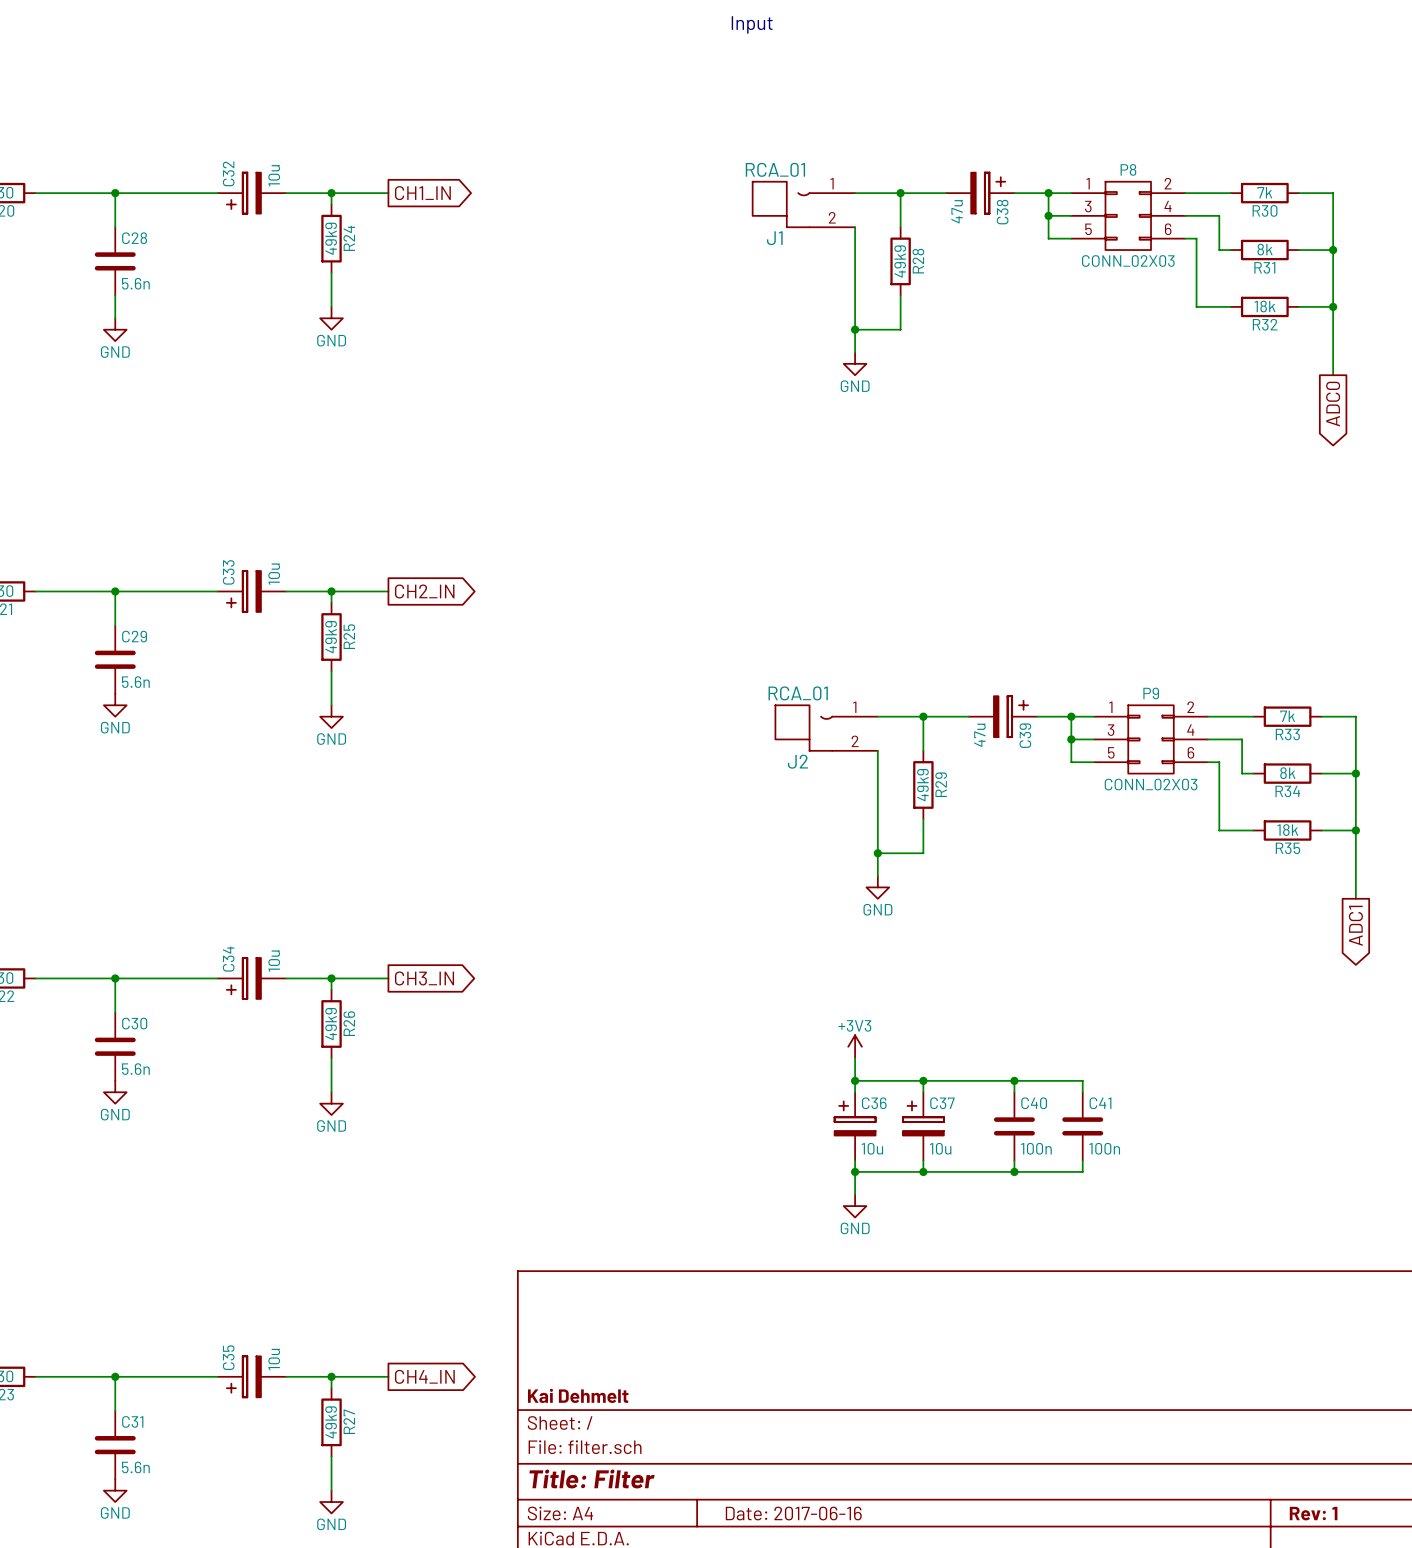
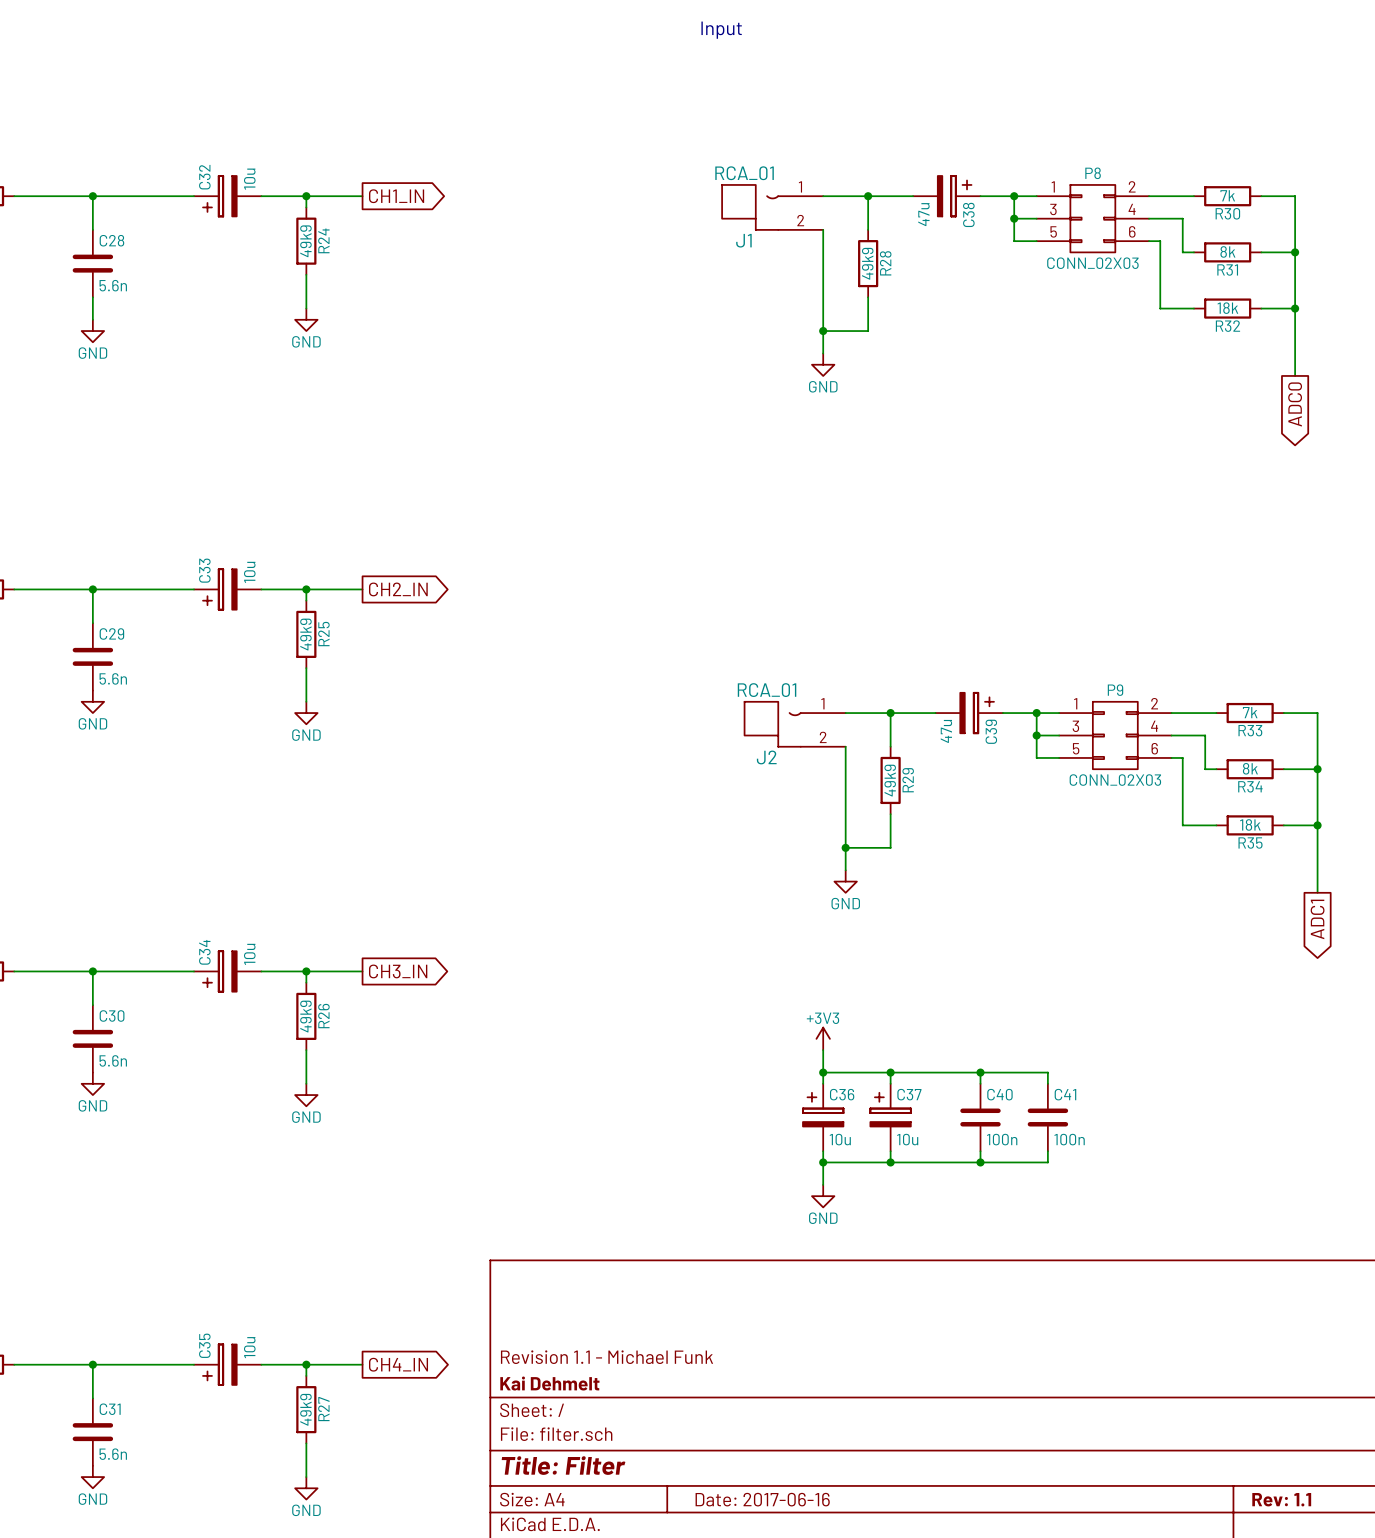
title block: none -> Revision 1.1 - Michael Funk (607, 1357)
title block: Rev: 1 (1313, 1513) -> Rev: 1.1 (1281, 1499)

